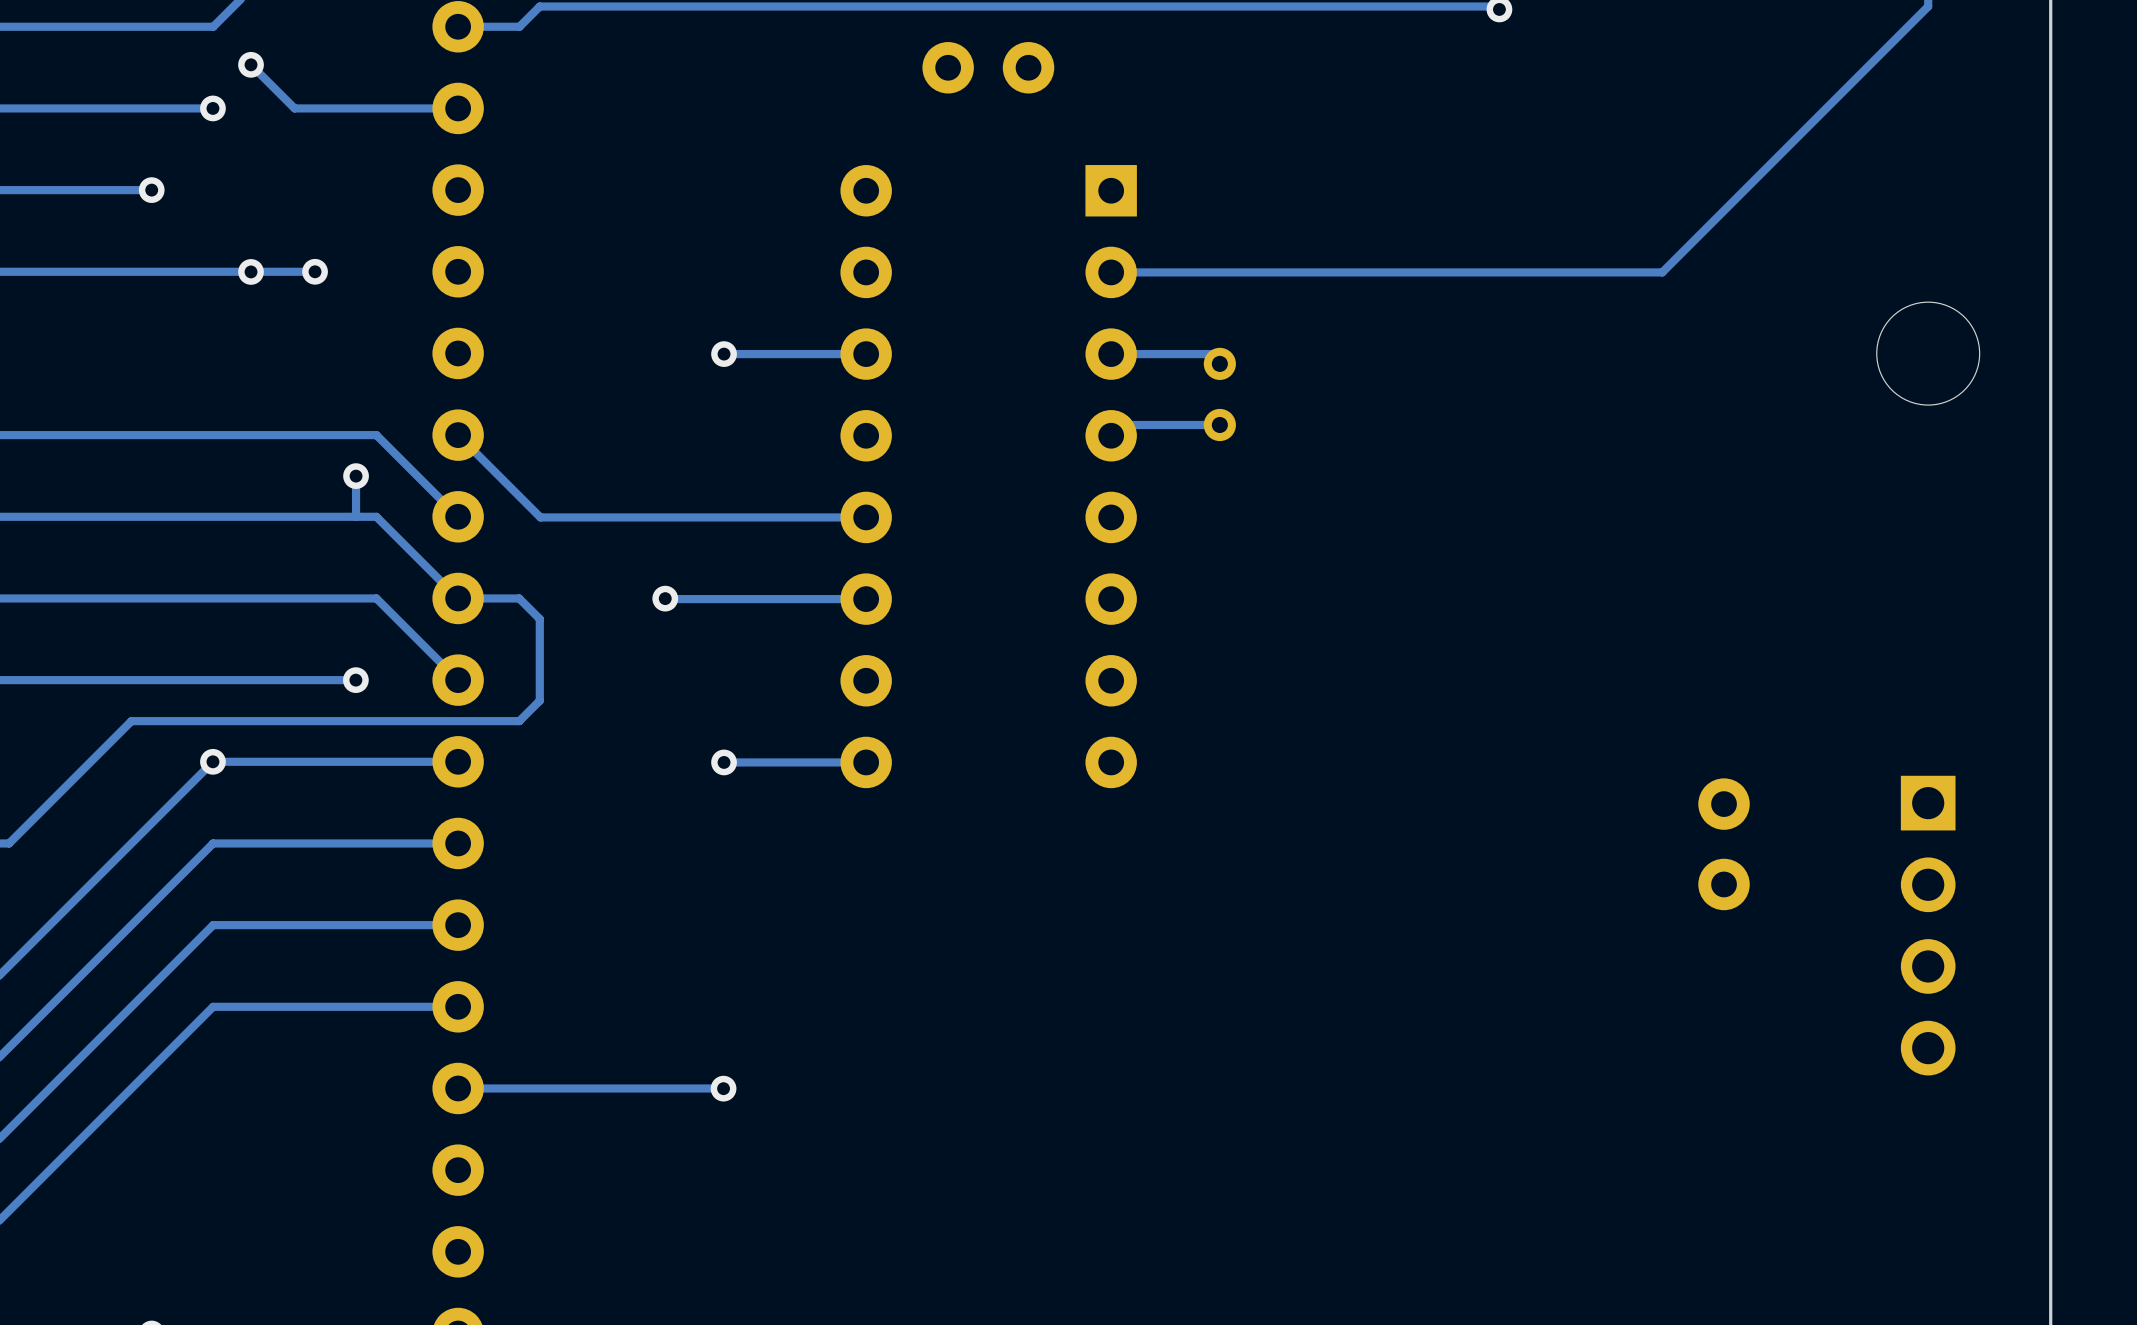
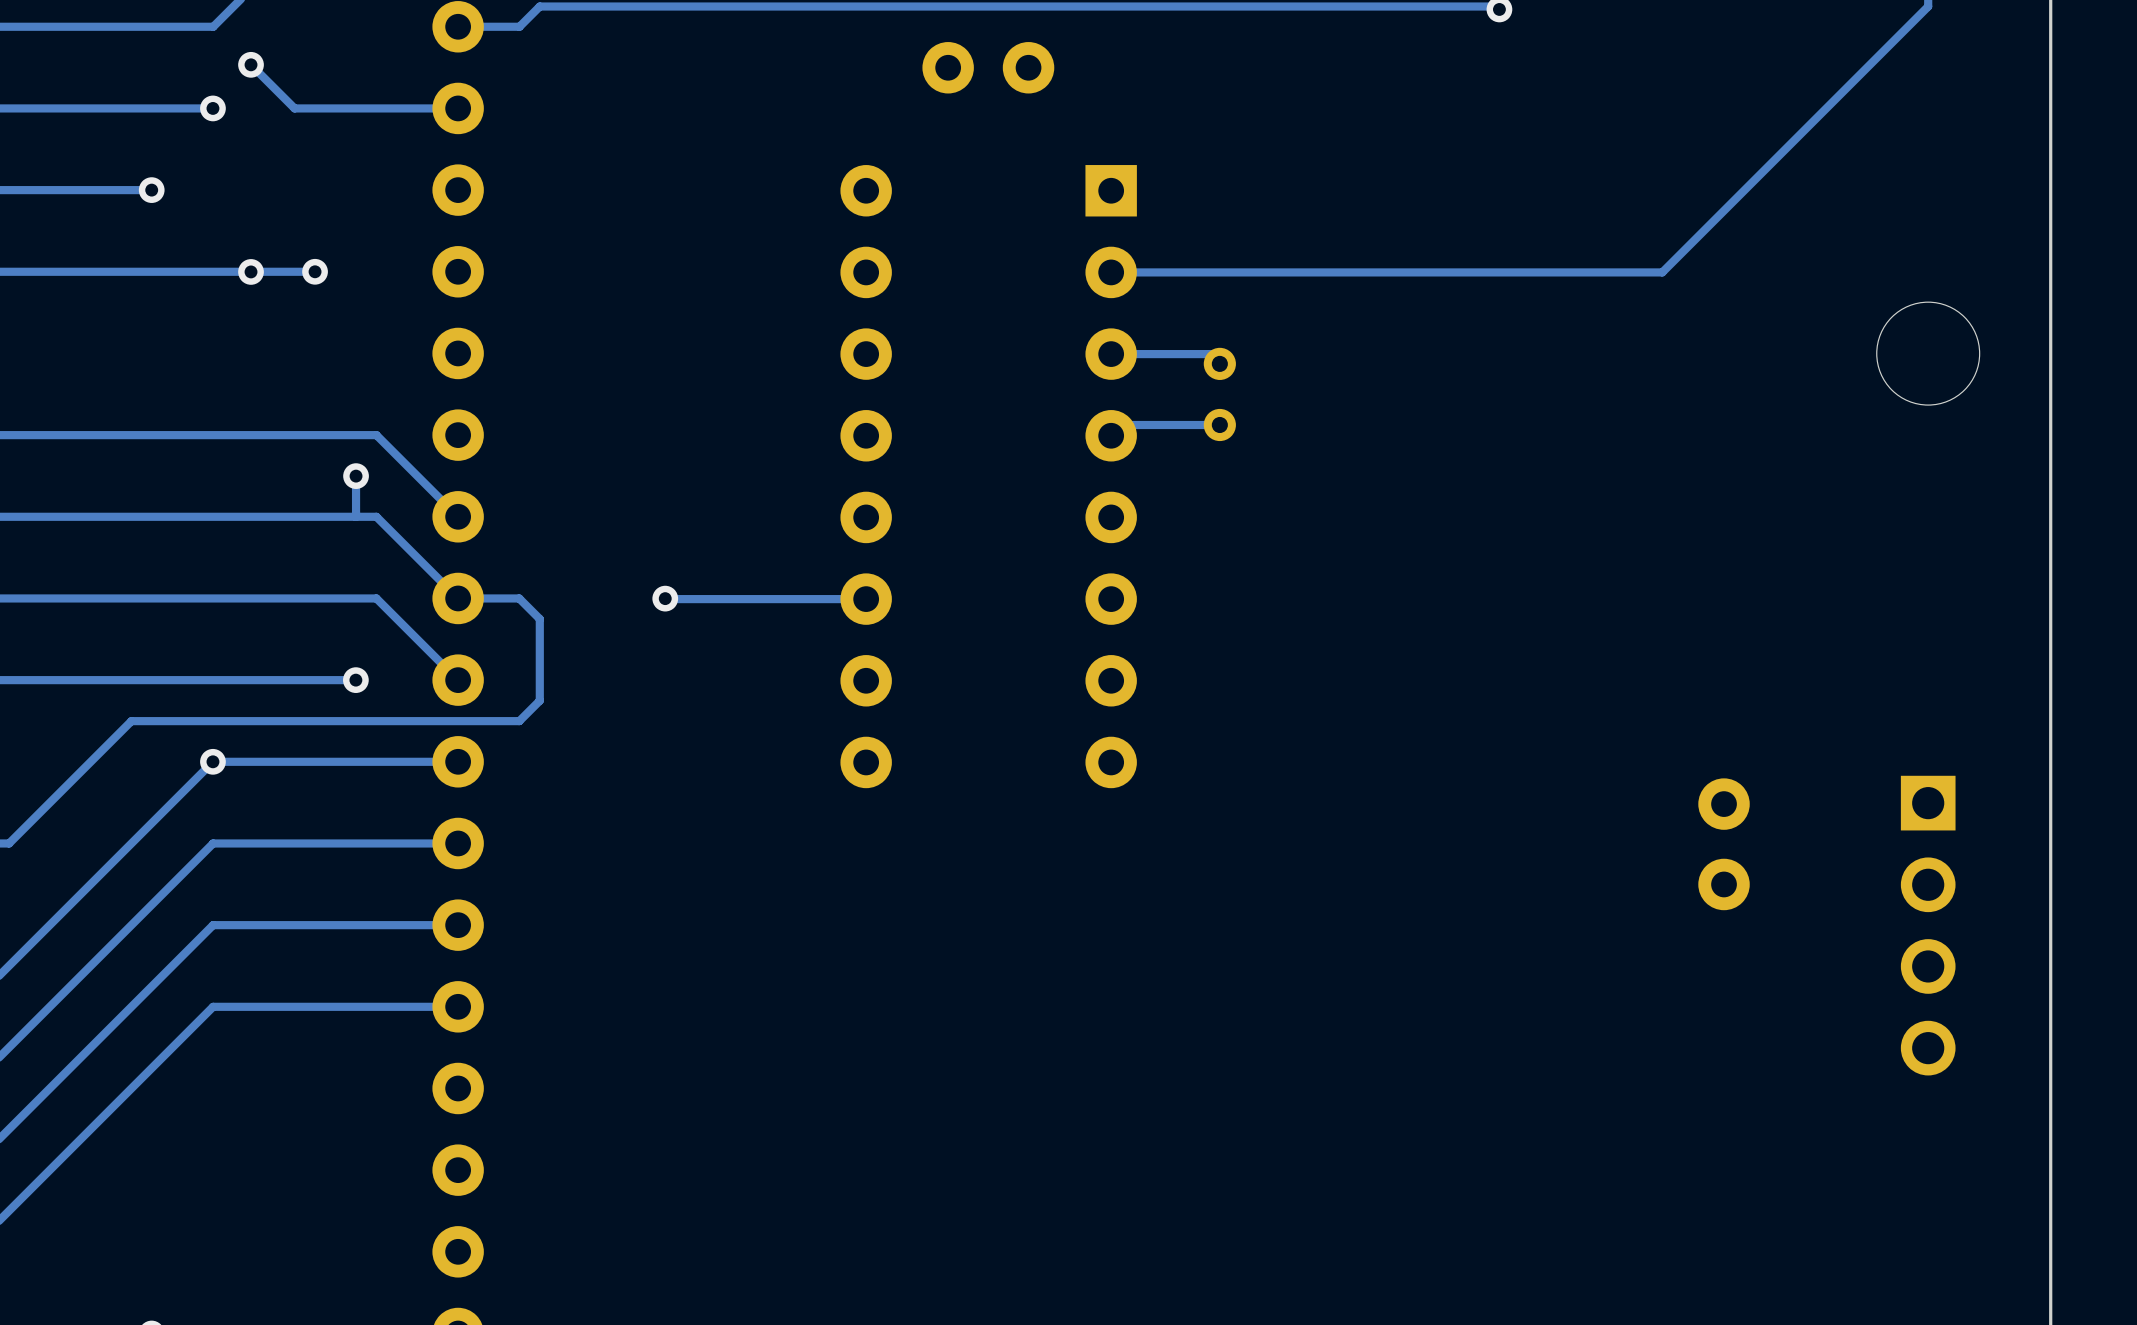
track: (723, 353) (866, 354) -> none
via: (724, 354) -> none
track: (458, 435) (540, 517) (866, 517) -> none
track: (723, 761) (866, 762) -> none
via: (724, 762) -> none
track: (723, 1088) (458, 1088) -> none
via: (723, 1088) -> none

